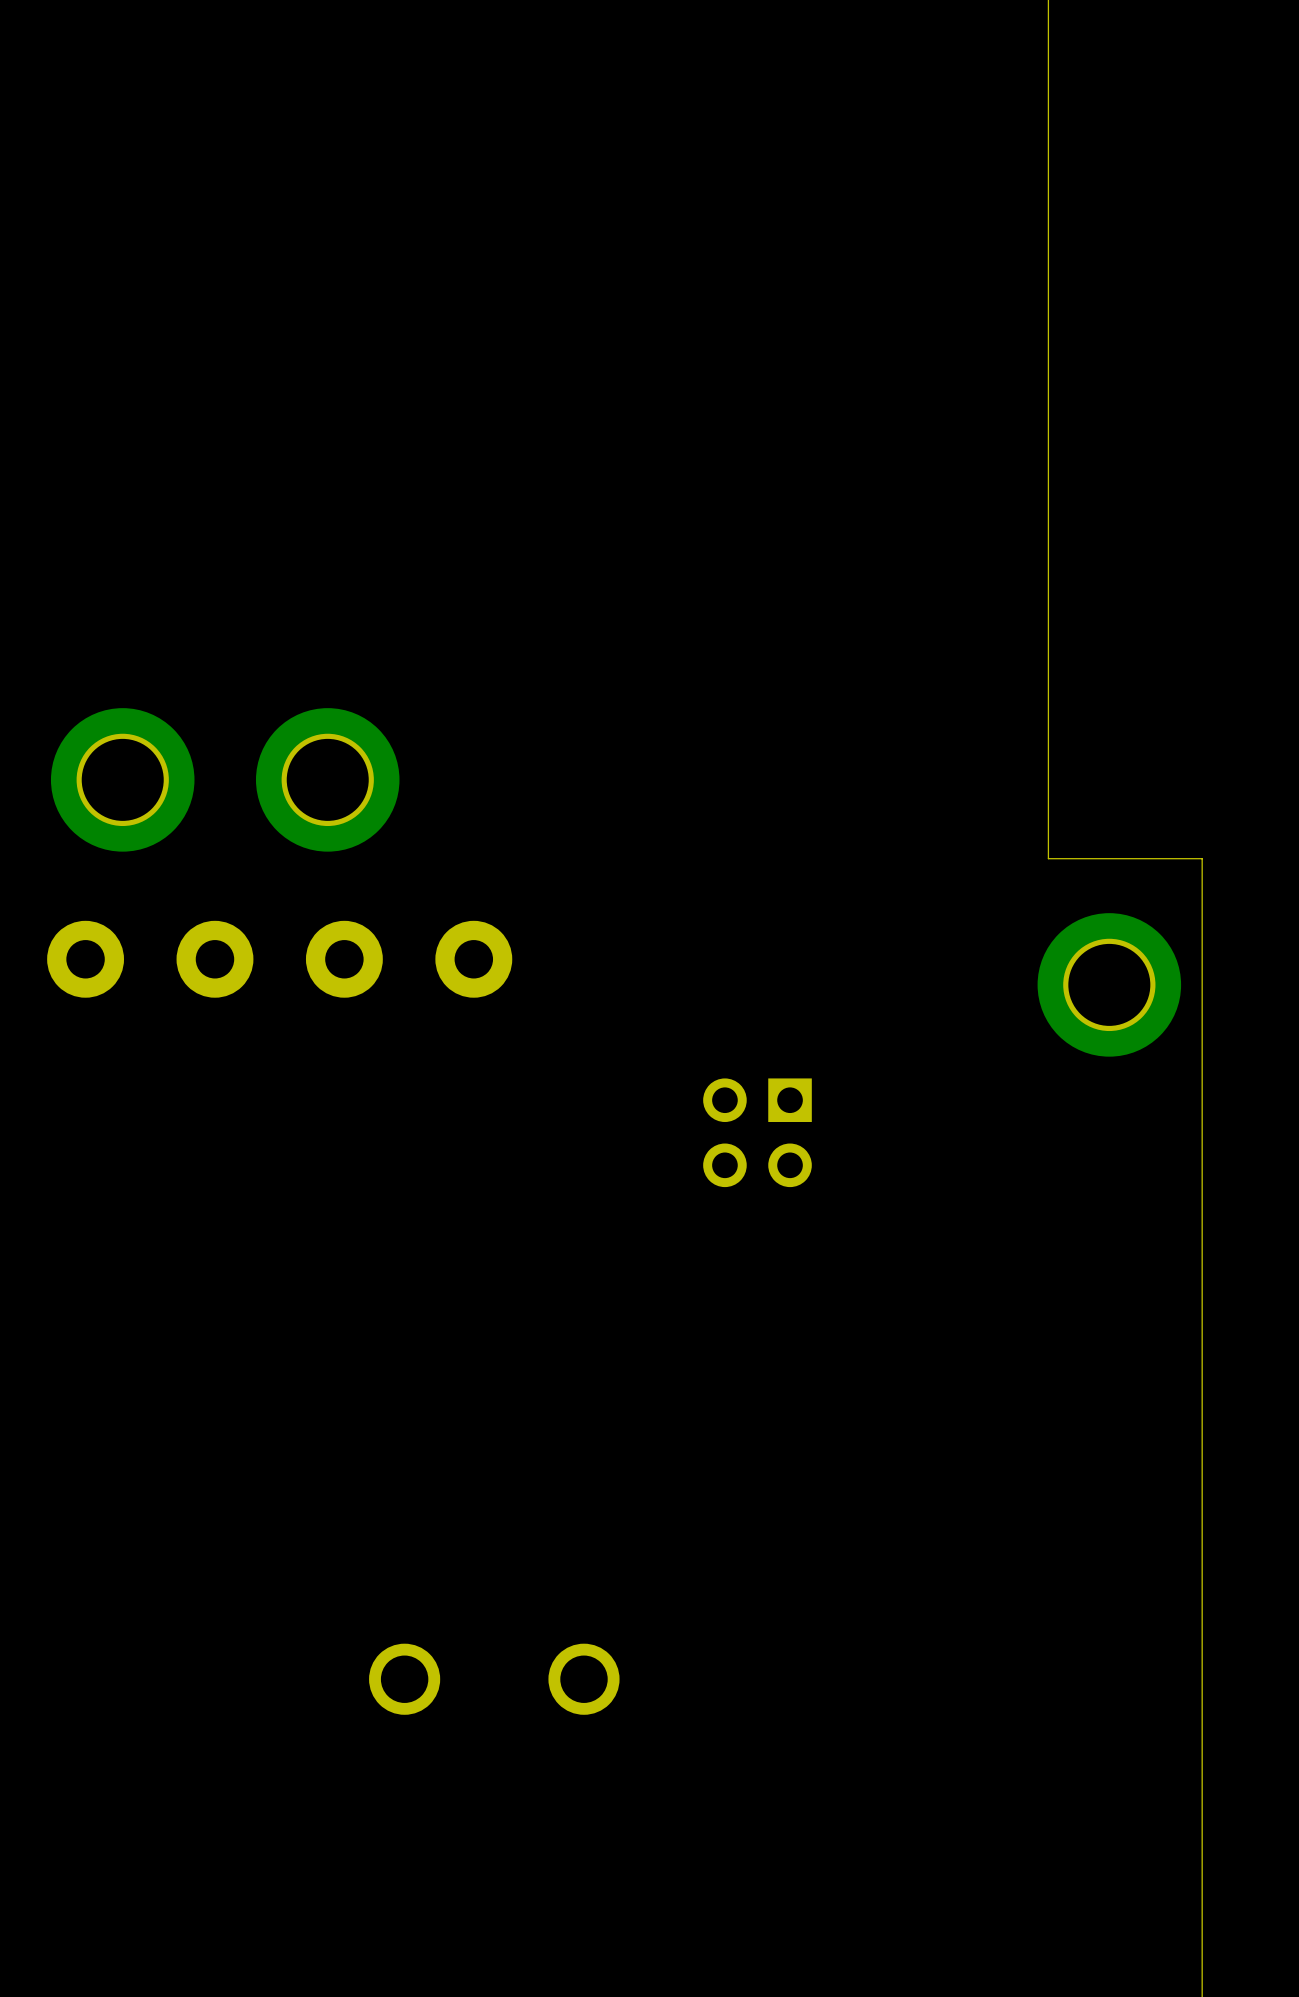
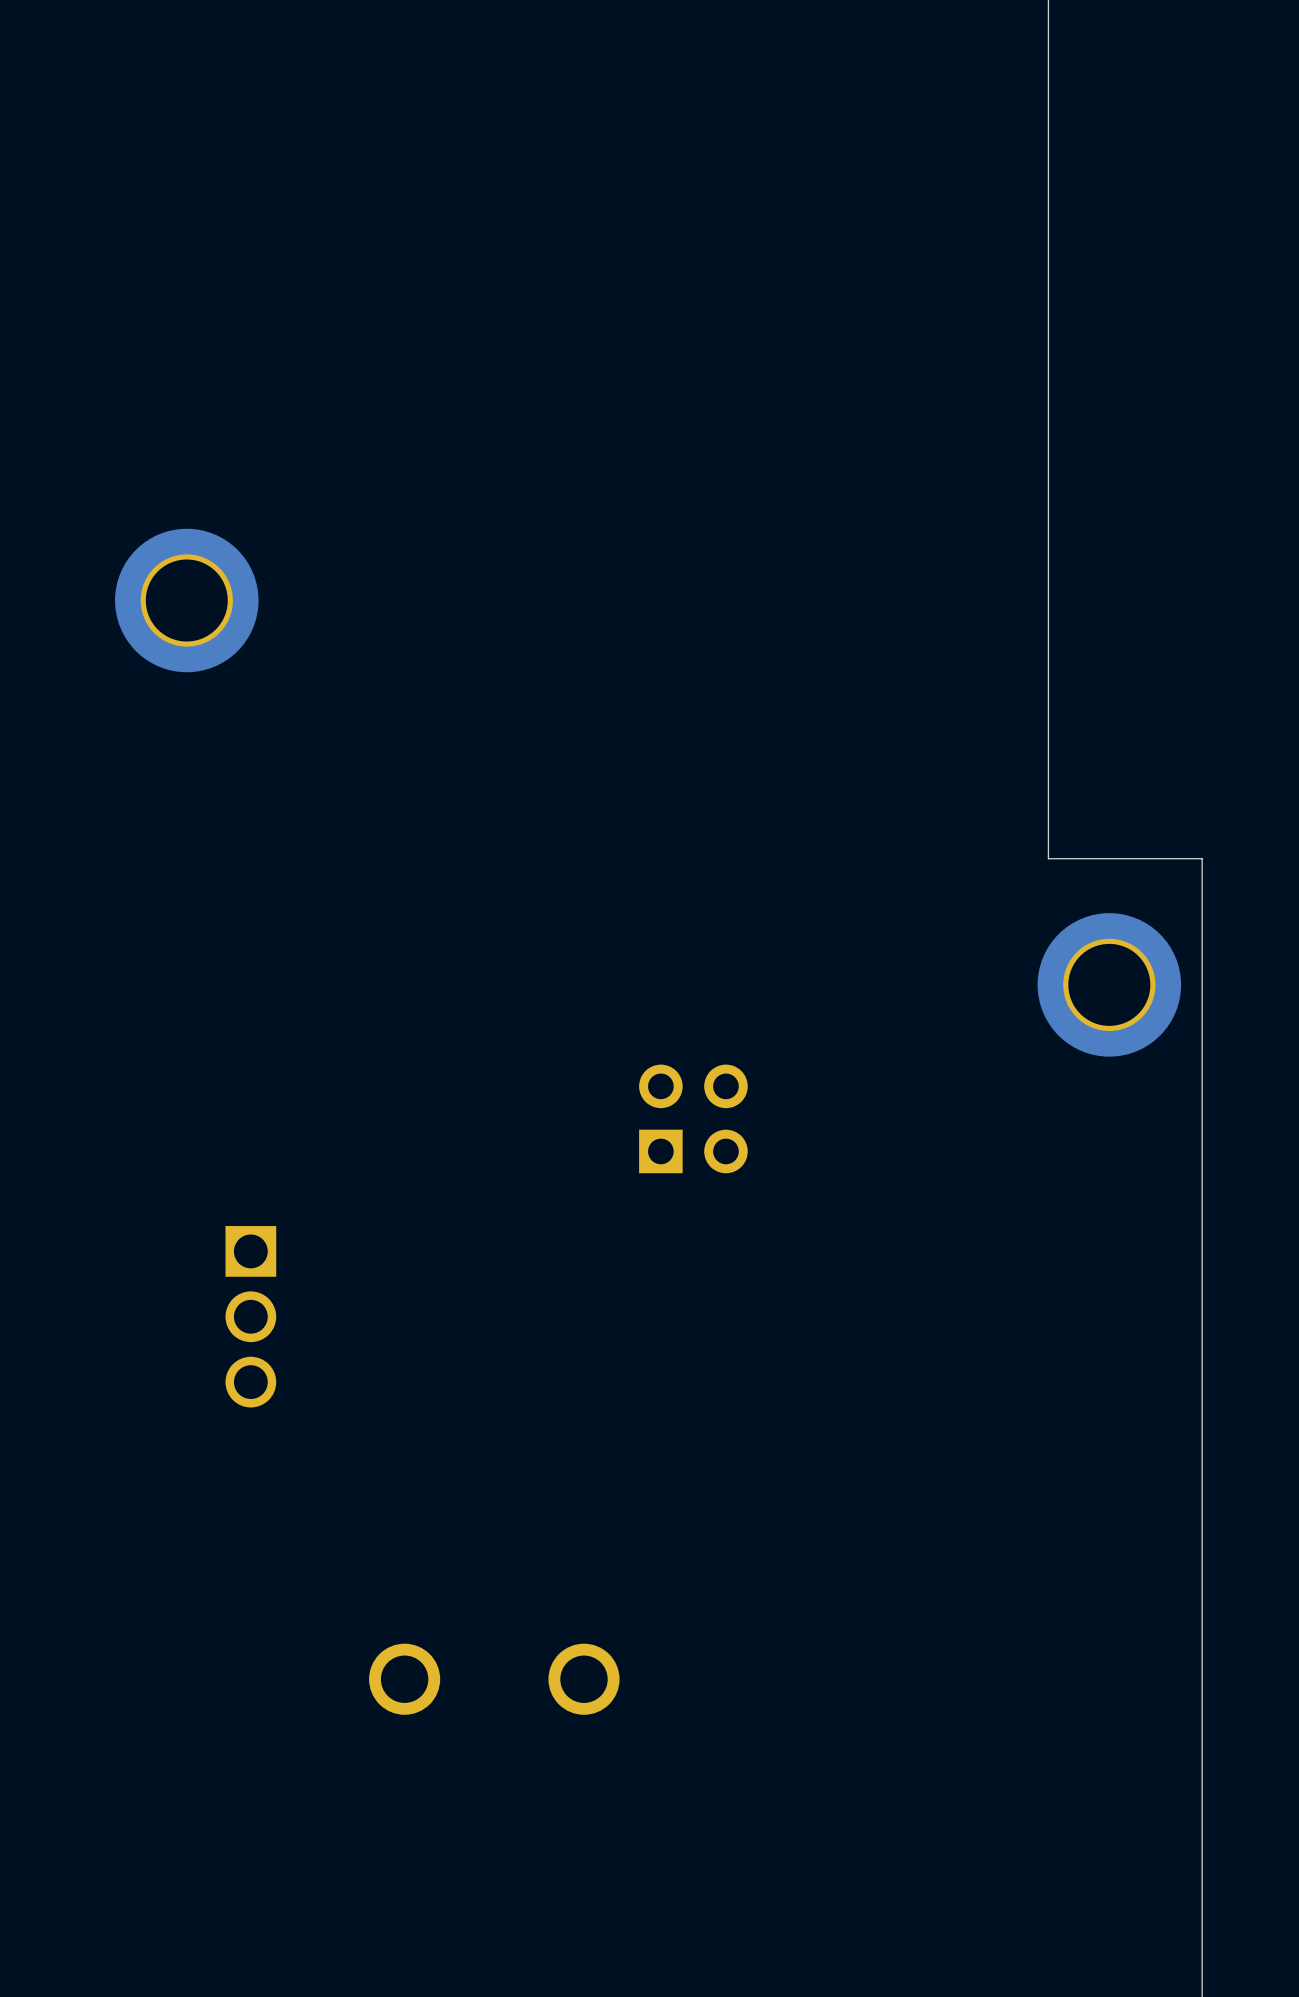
part: none -> (186, 600)
part: (122, 779) -> none
part: (327, 779) -> none
part: (85, 959) -> none
part: (214, 959) -> none
part: (344, 959) -> none
part: (473, 959) -> none
part rotation: 0° (757, 1132) -> 180° (693, 1118)
part position: (757, 1132) -> (693, 1118)
part: none -> (250, 1316)

